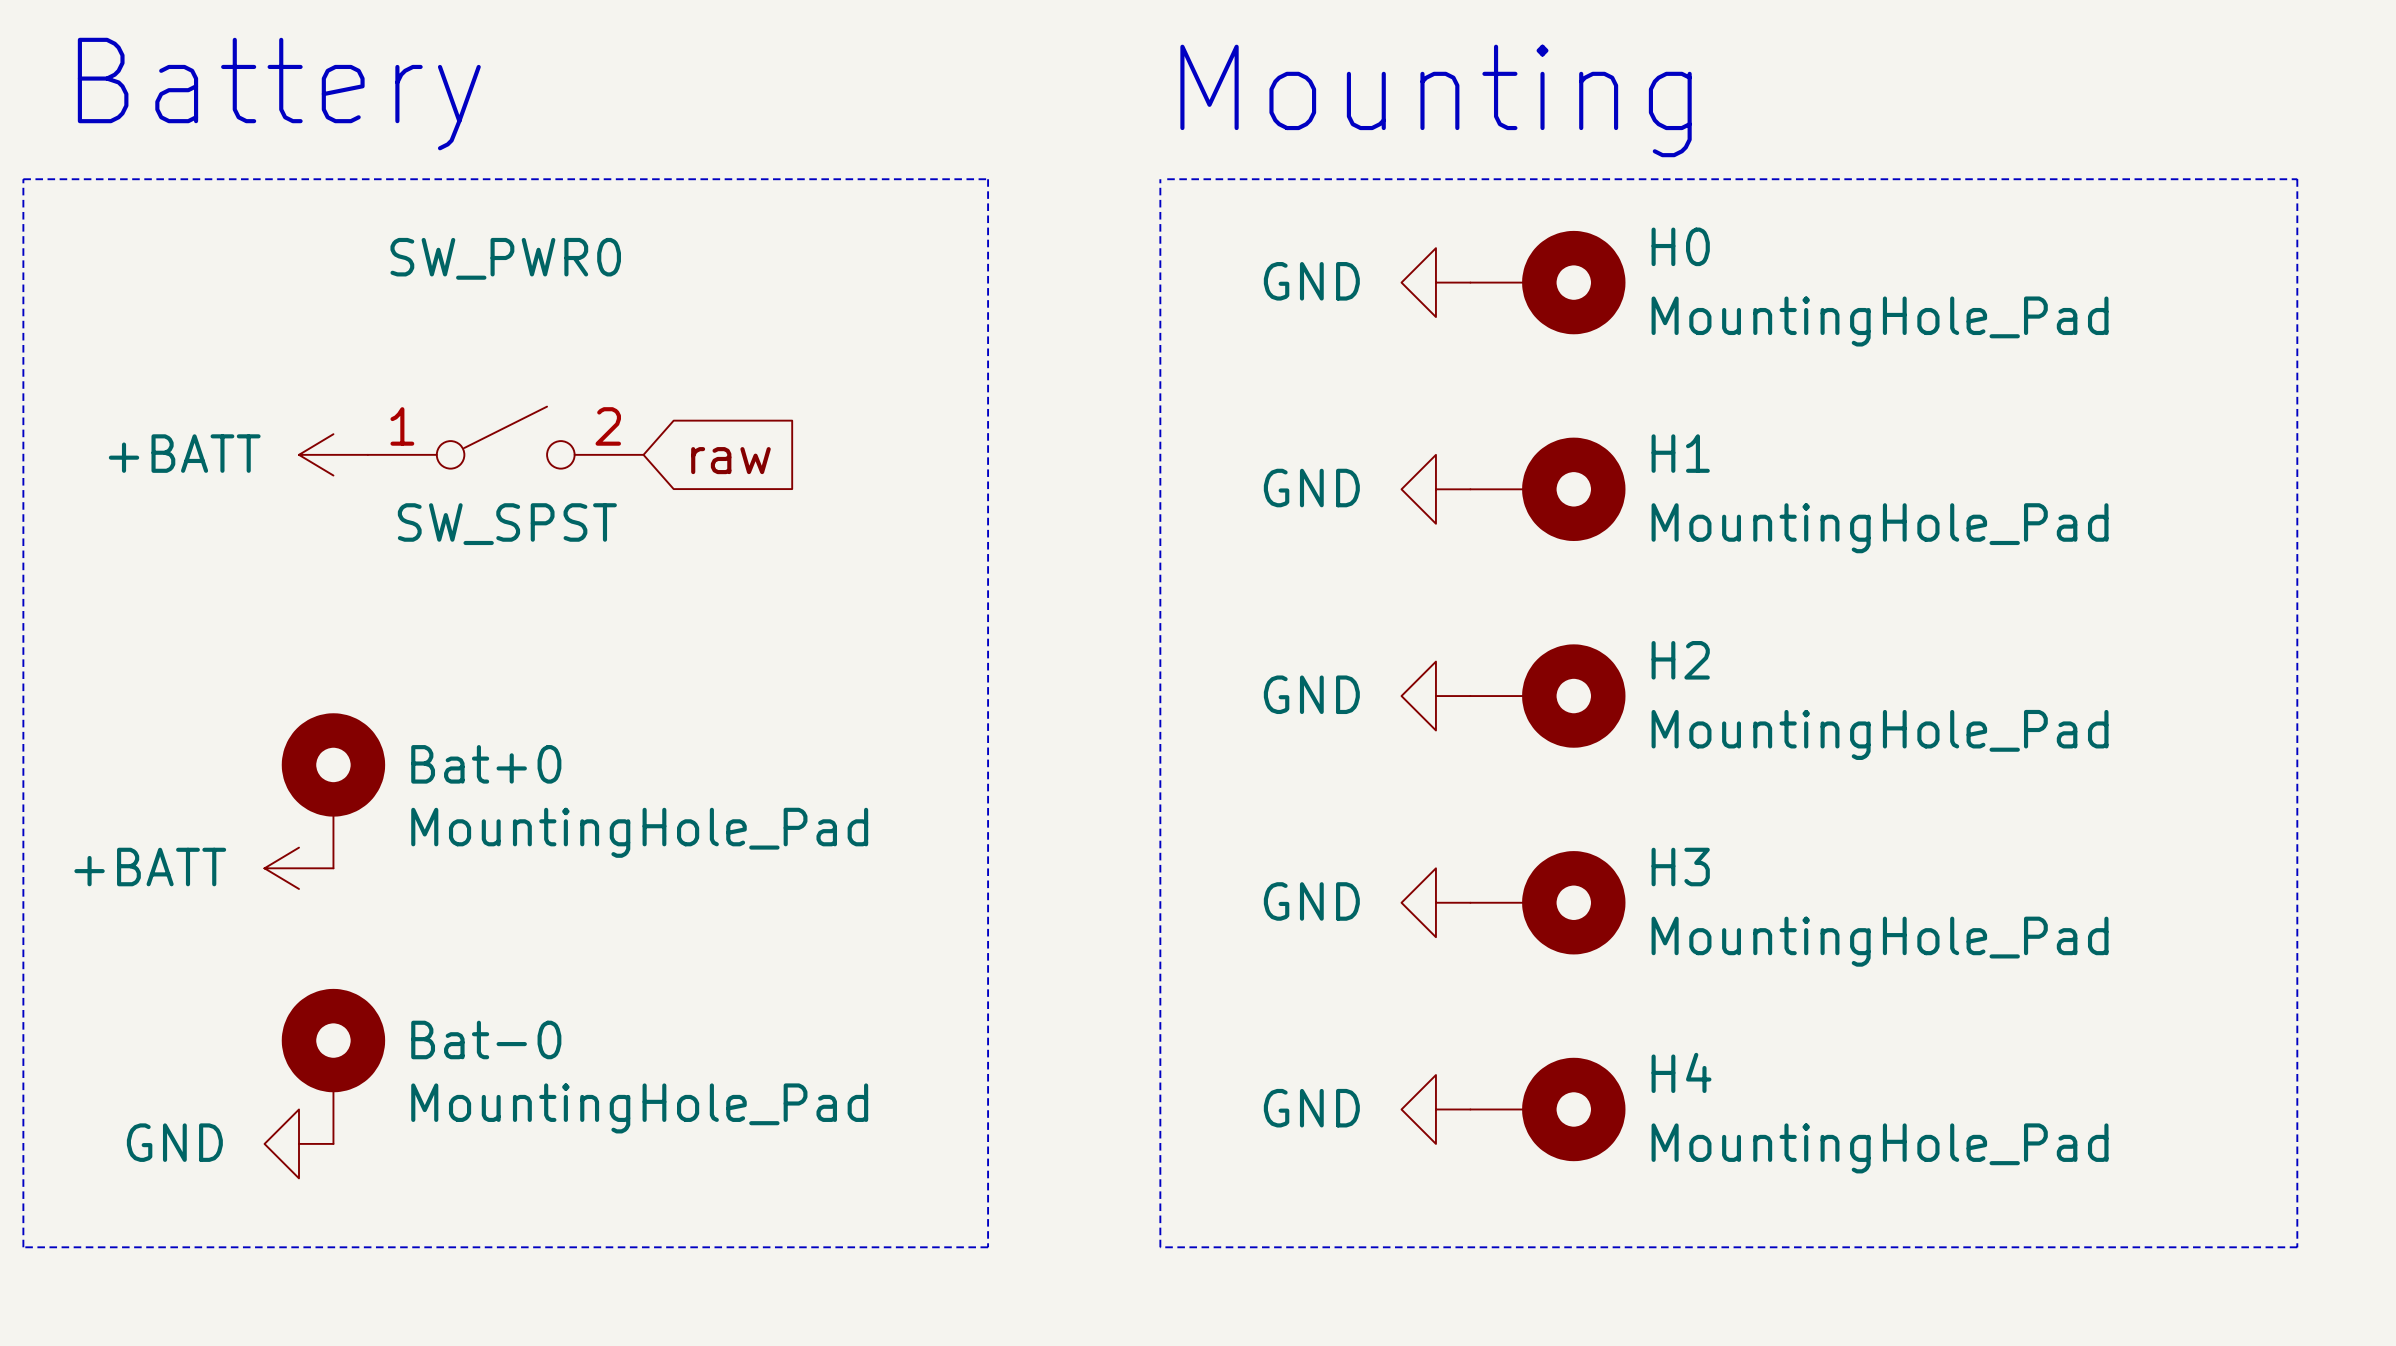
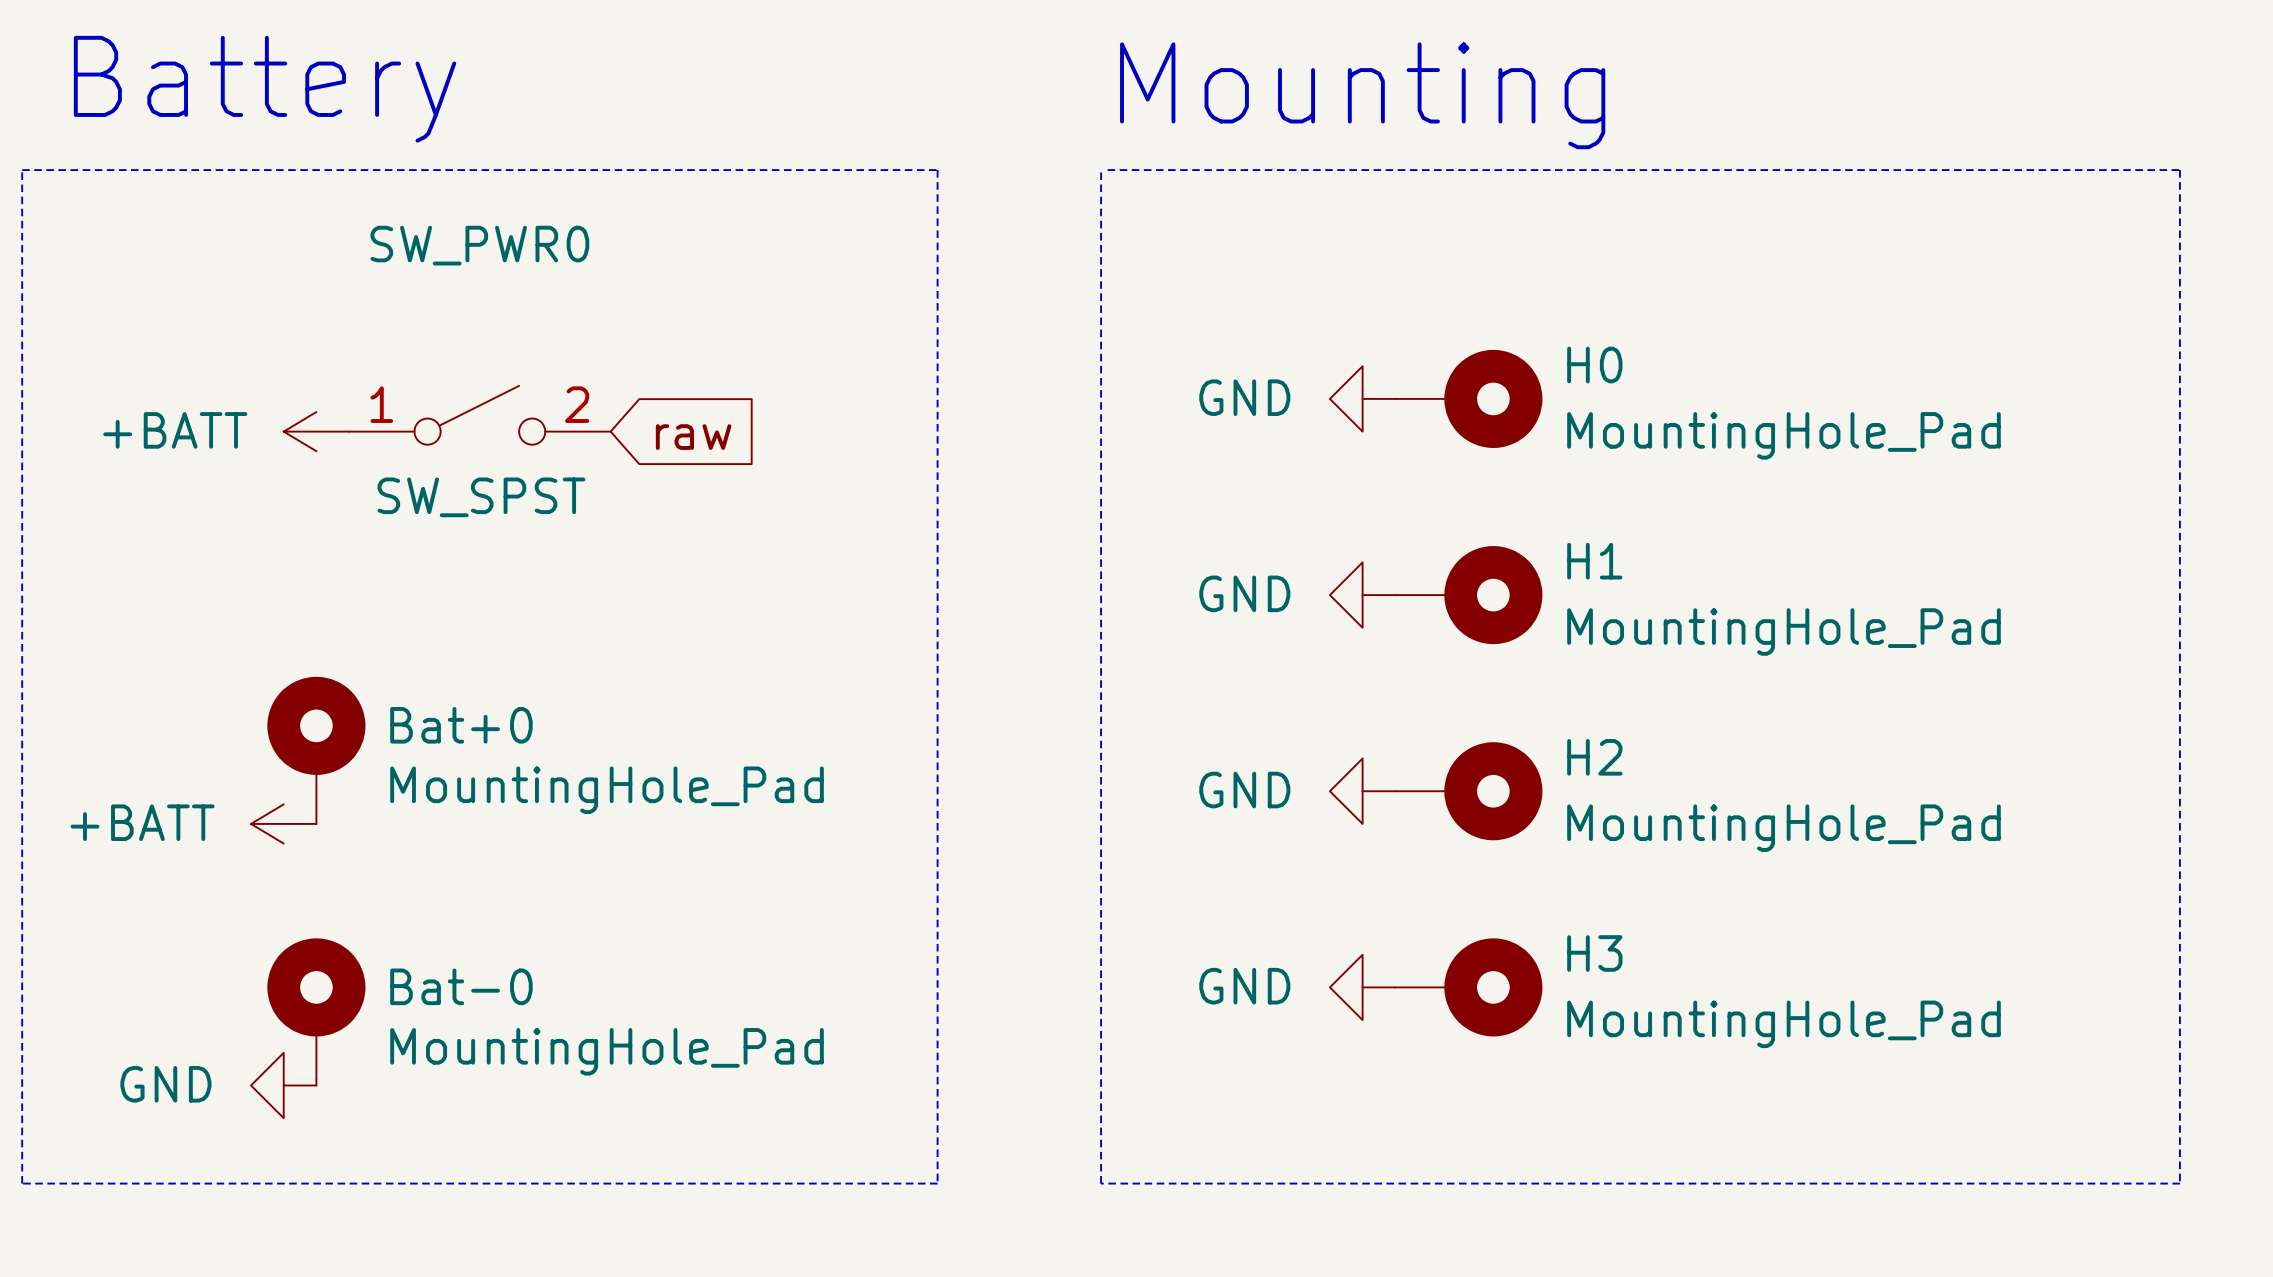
power symbol: GND (1435, 282) -> none
H0 position: (1547, 282) -> (1468, 398)
power symbol: none -> GND (1362, 398)
power symbol: GND (1435, 489) -> none
H1 position: (1547, 489) -> (1468, 595)
power symbol: none -> GND (1362, 595)
power symbol: GND (1435, 696) -> none
H2 position: (1547, 696) -> (1468, 791)
power symbol: none -> GND (1362, 791)
power symbol: GND (1435, 902) -> none
H3 position: (1547, 902) -> (1468, 987)
power symbol: none -> GND (1362, 987)
power symbol: GND (1435, 1109) -> none
H4: MountingHole_Pad (1547, 1109) -> none

